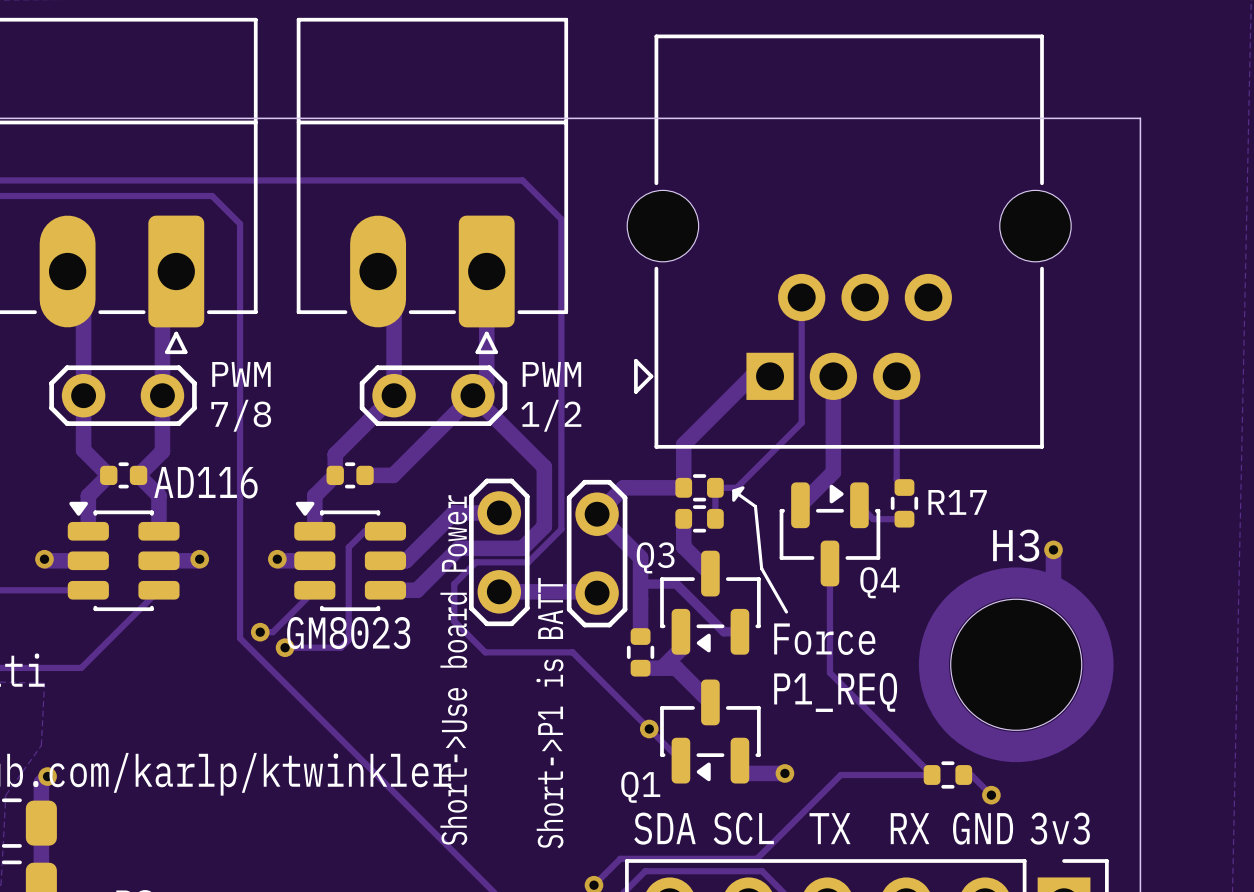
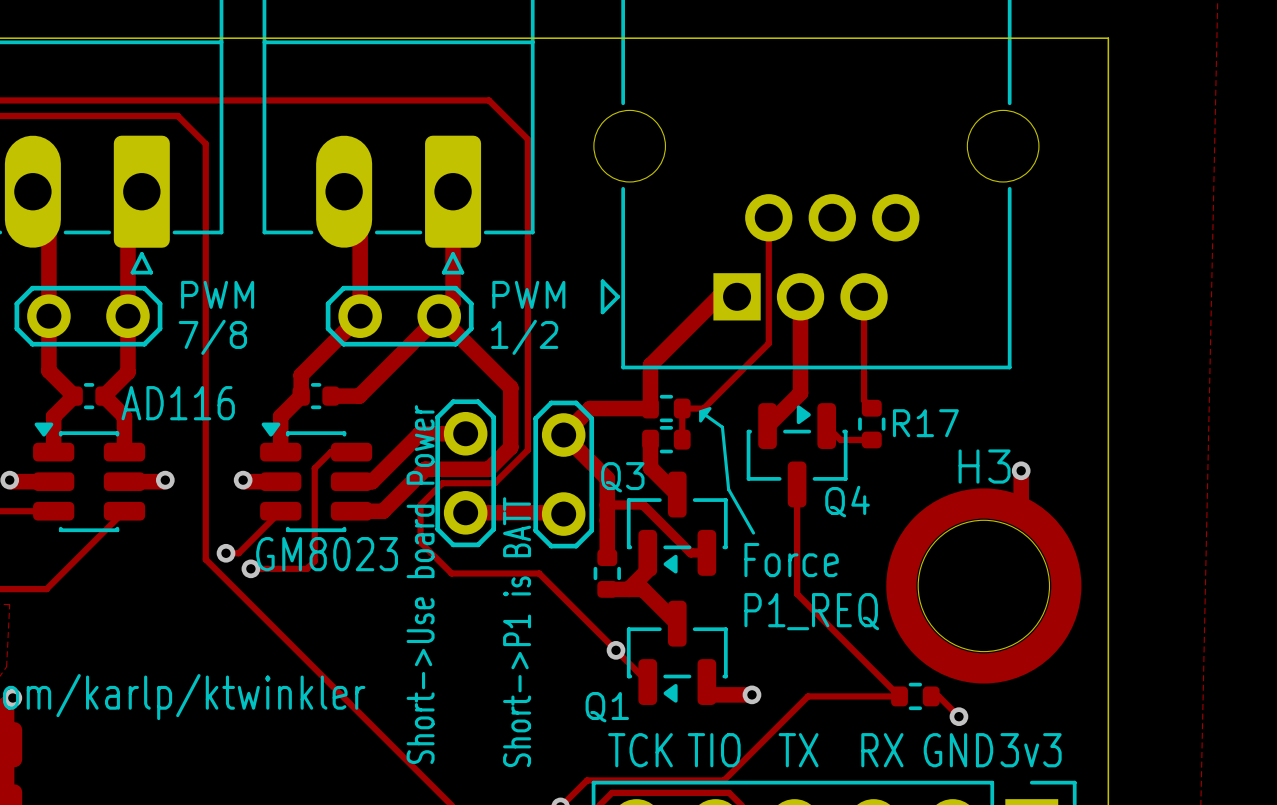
text: SDA (664, 828) -> TCK (640, 750)
text: SCL (743, 828) -> TIO (714, 750)

